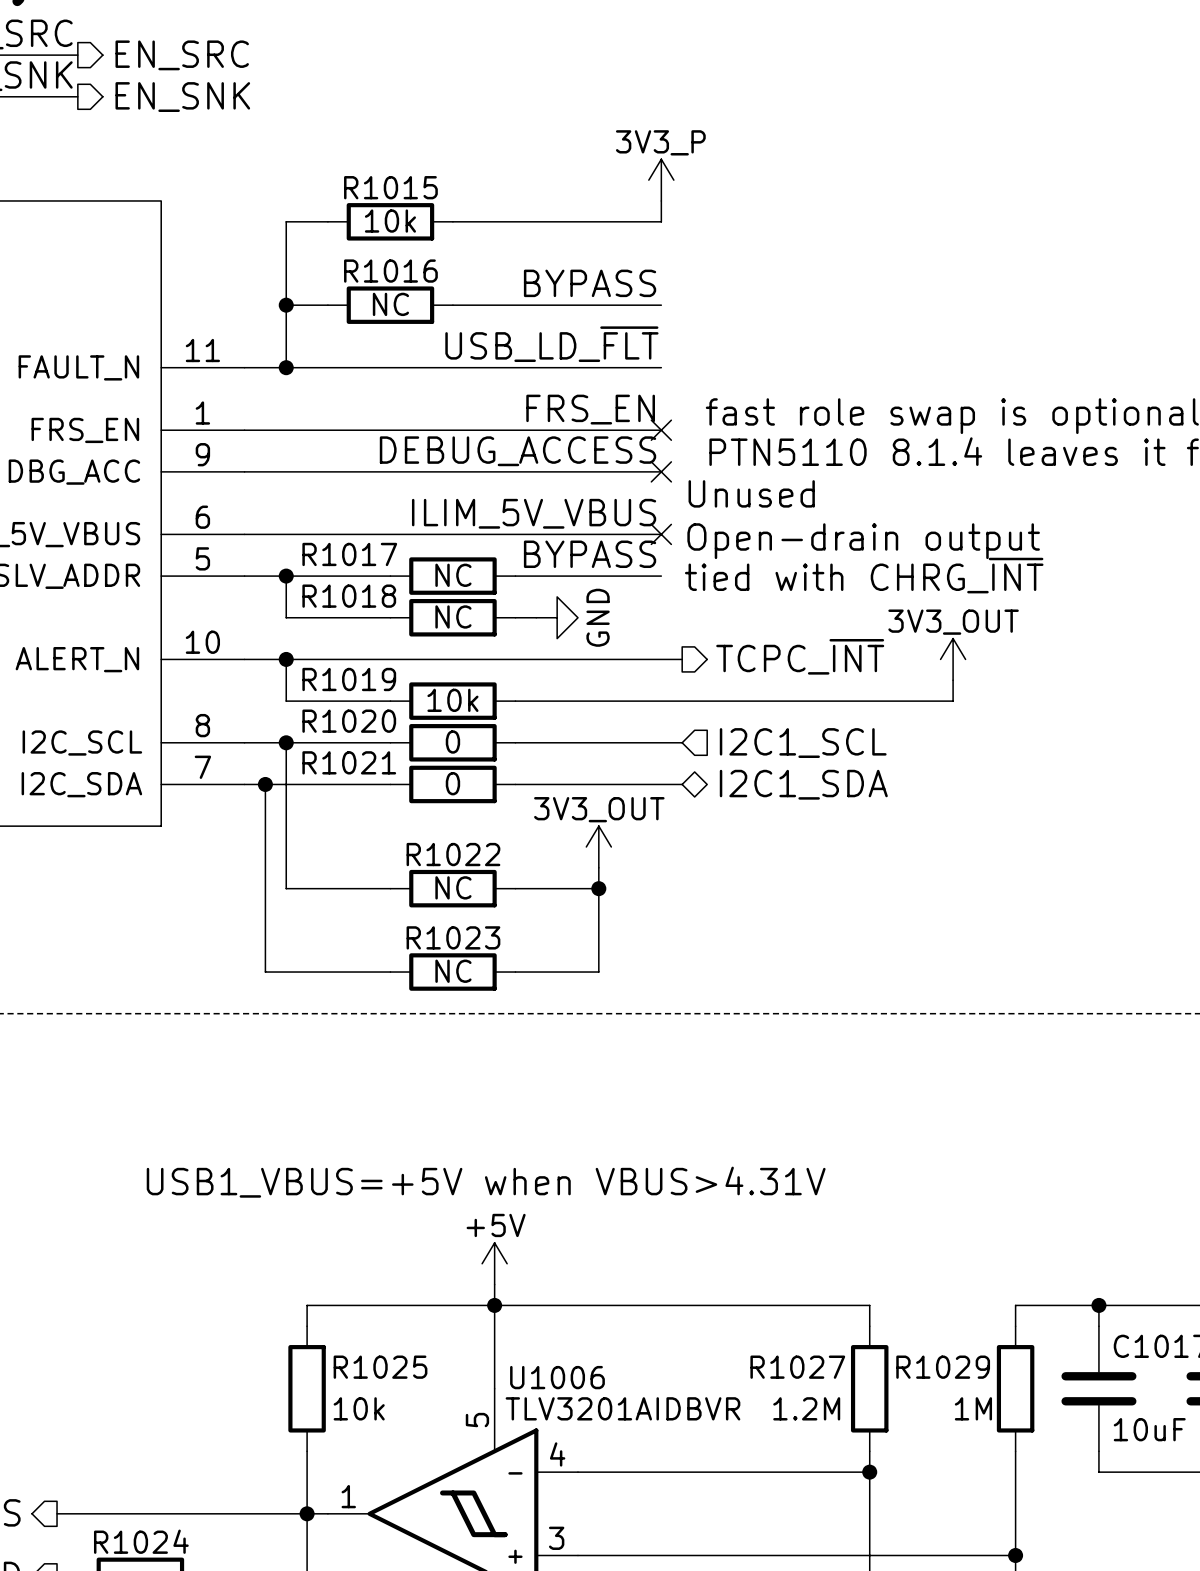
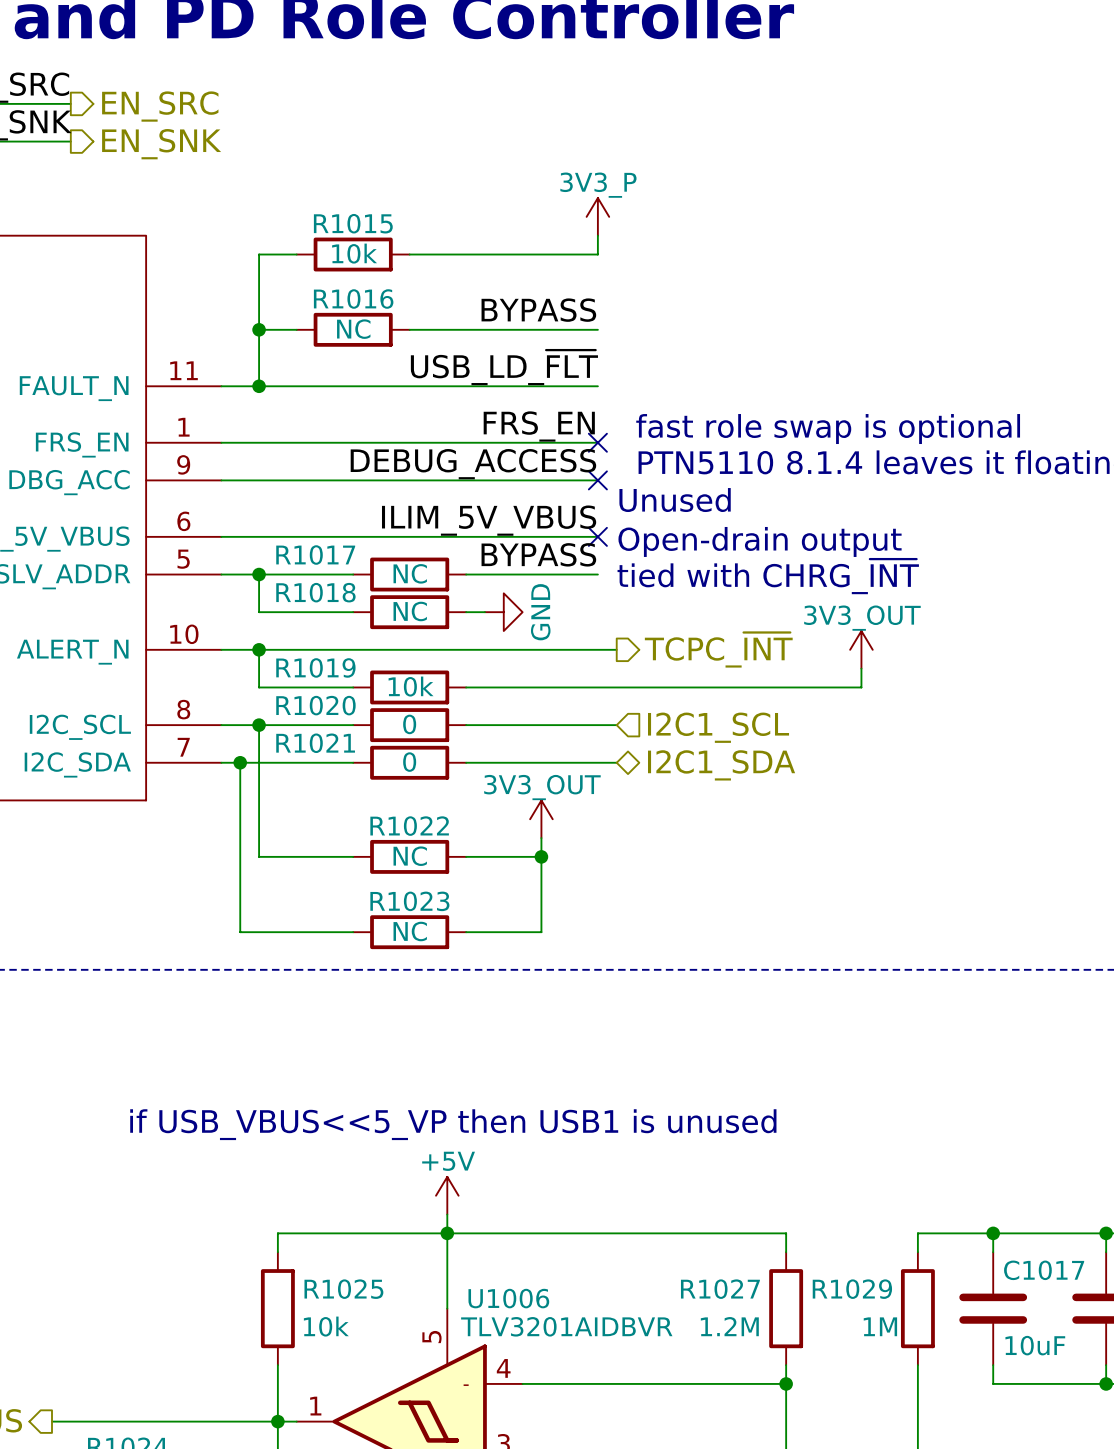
text: USB1_VBUS=+5V when VBUS>4.31V (486, 1182) -> if USB_VBUS<<5_VP then USB1 is unused (453, 1124)

